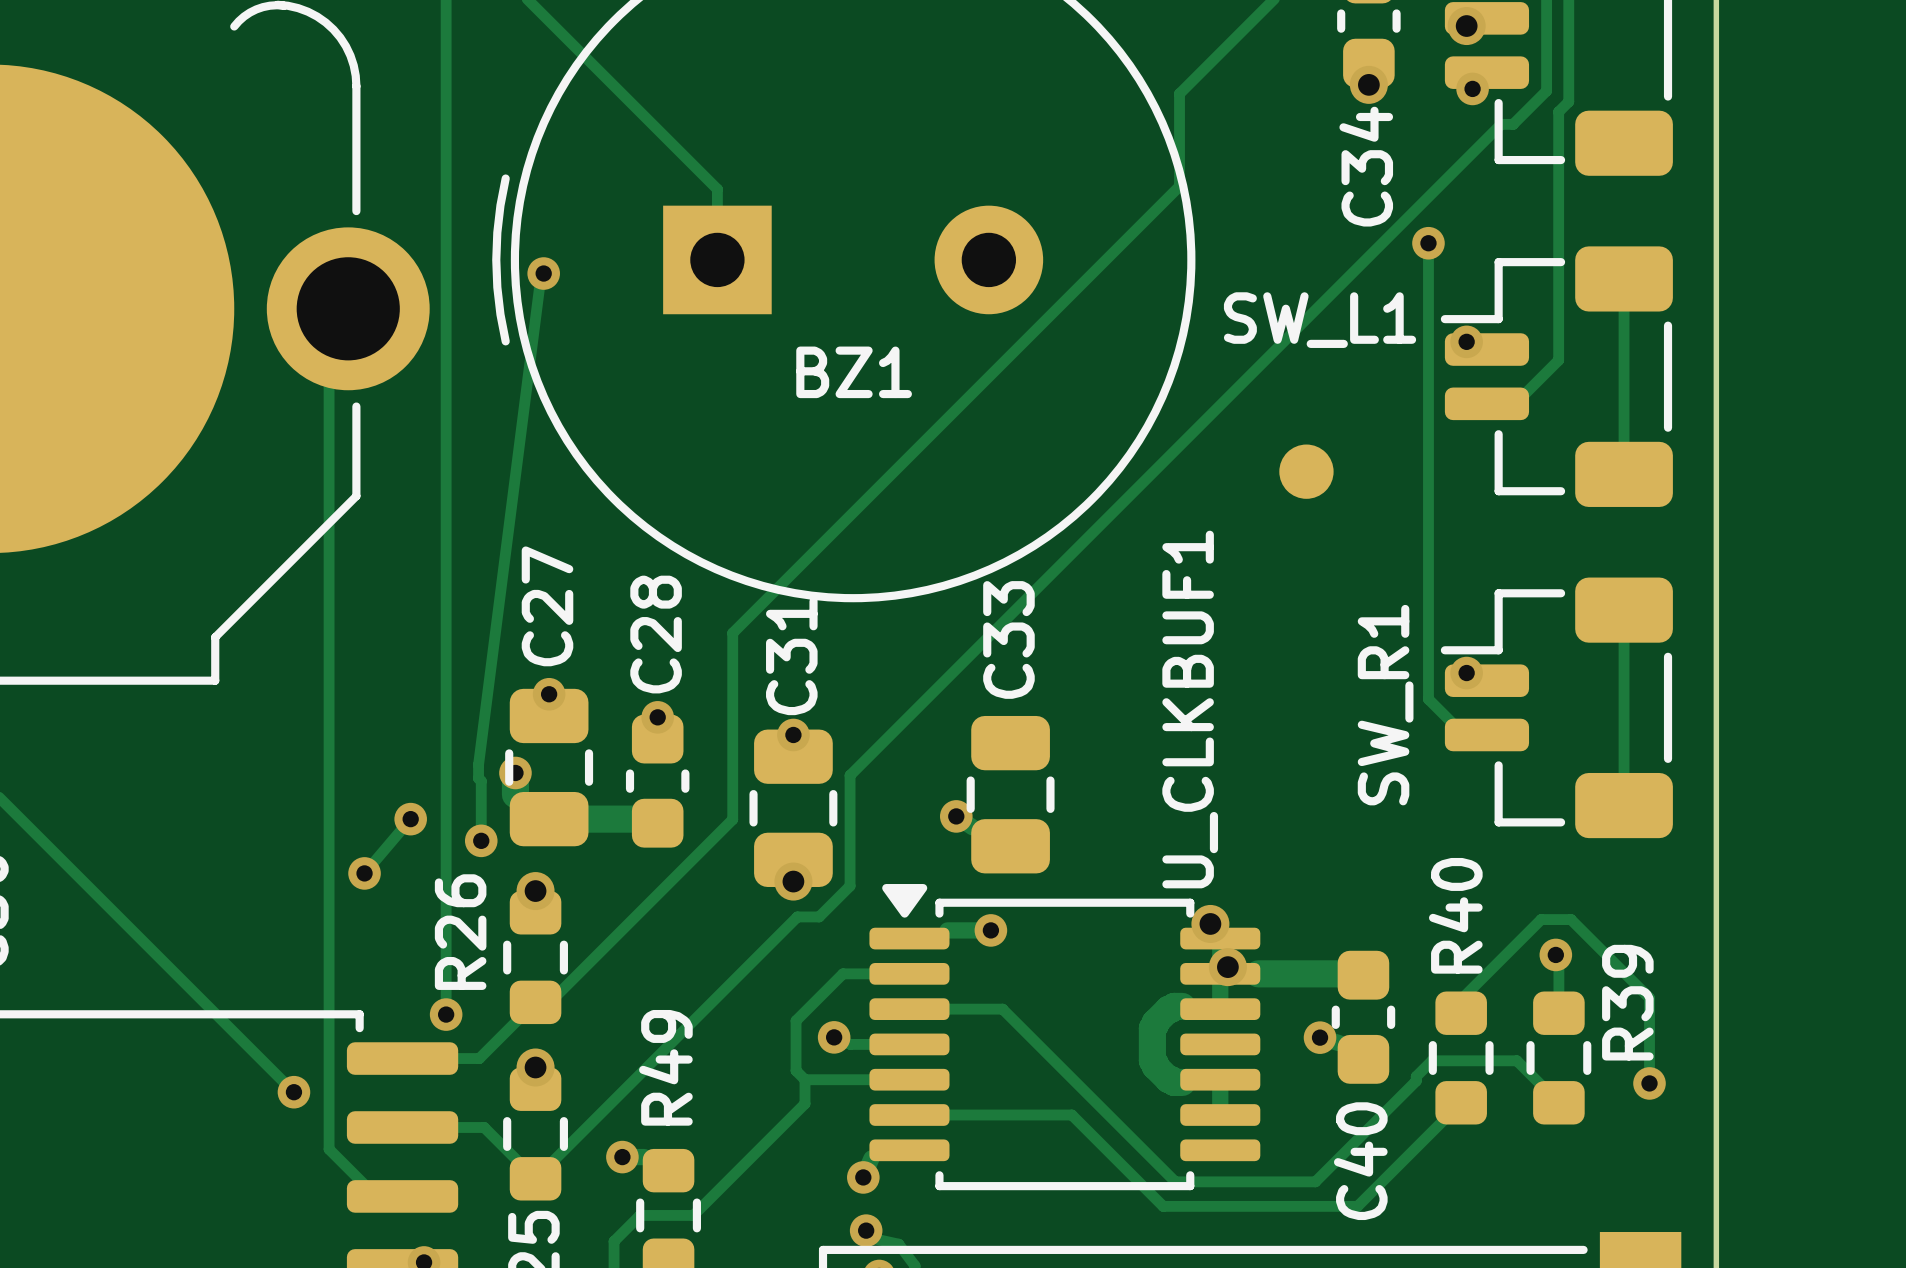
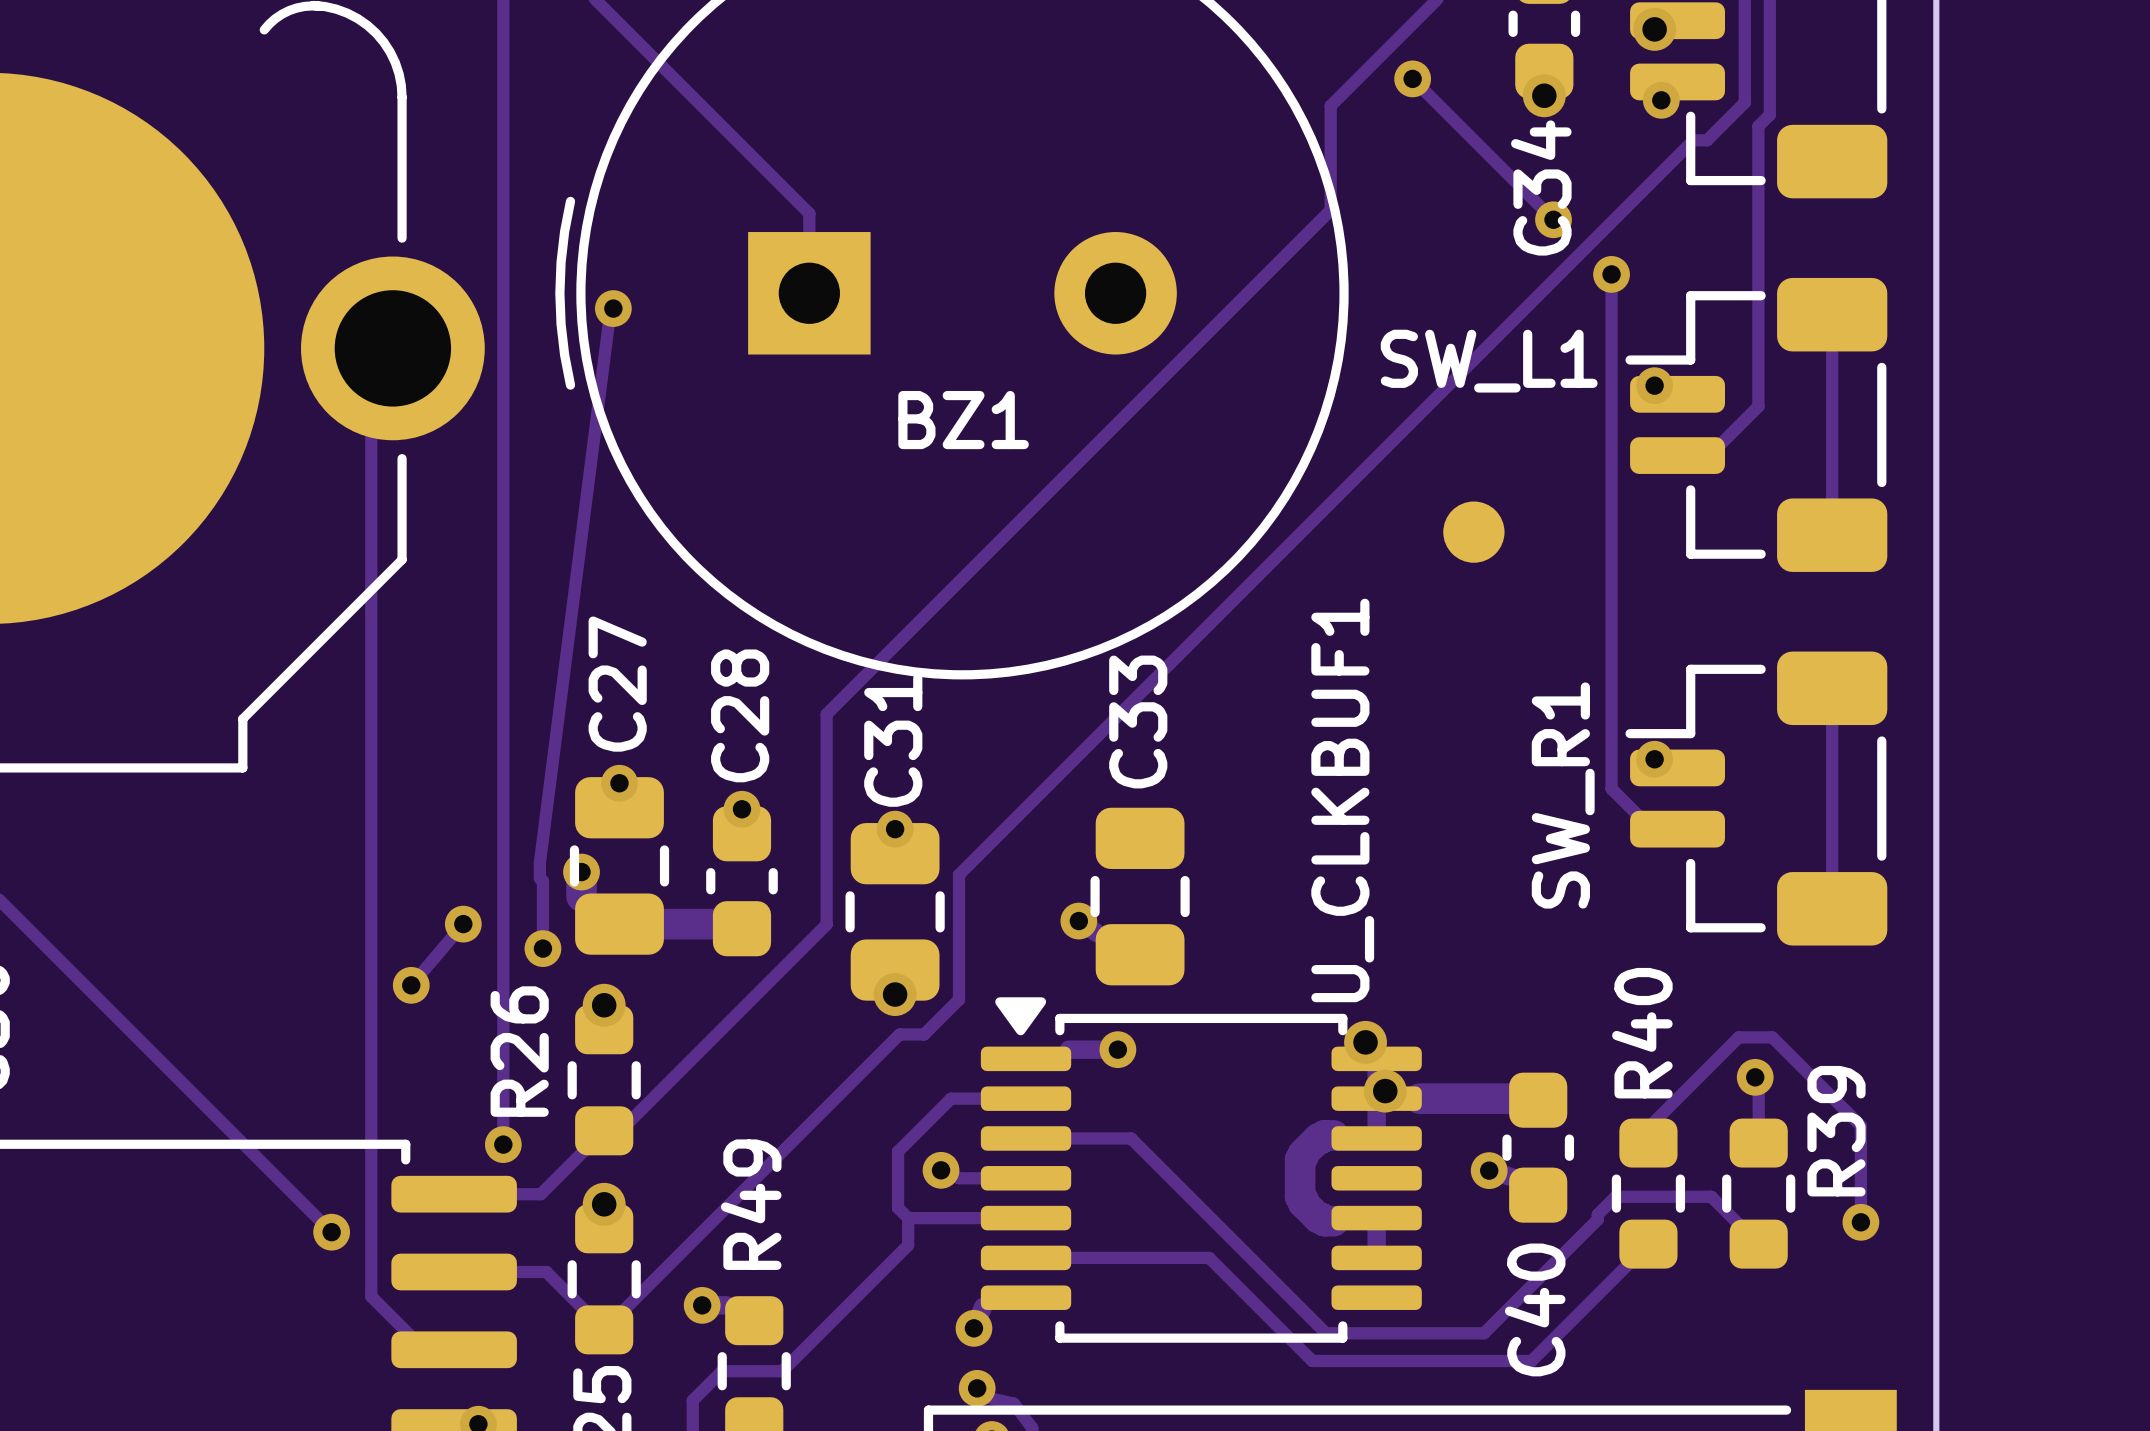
track: none -> (1412, 78) (1553, 219)
via: none -> (1412, 78)
via: none -> (1553, 219)

